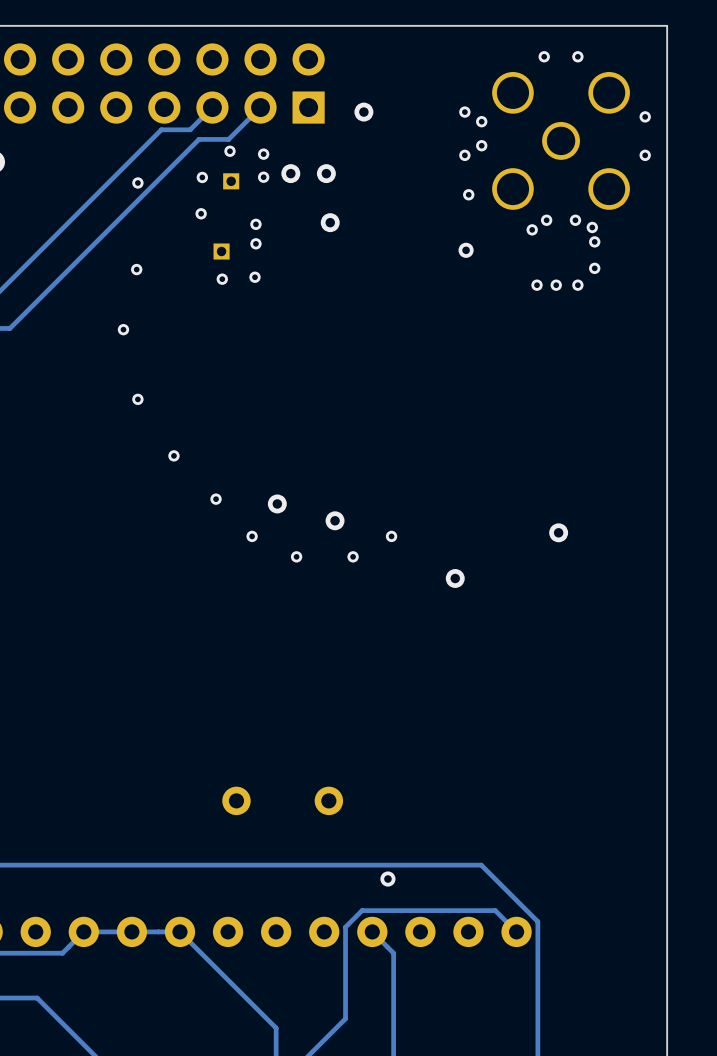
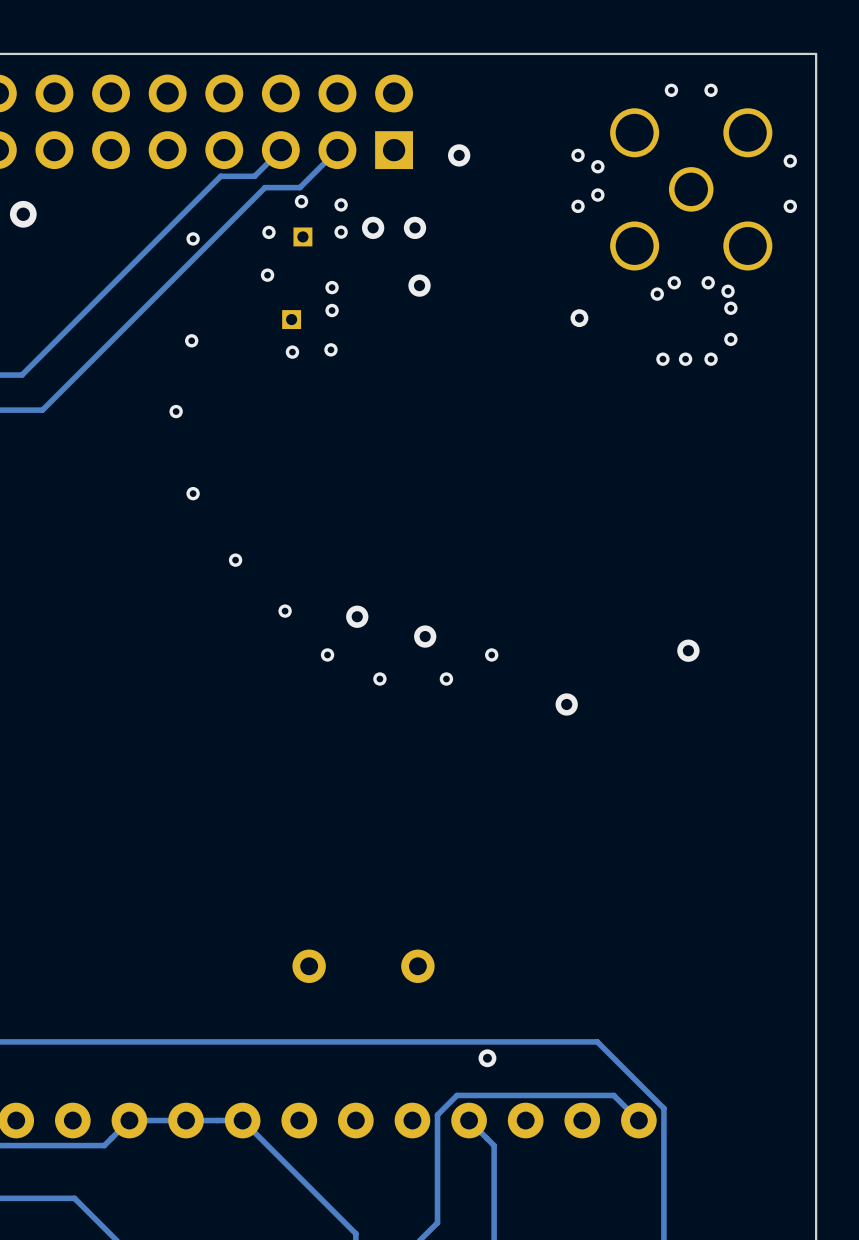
via: (468, 194) -> none

